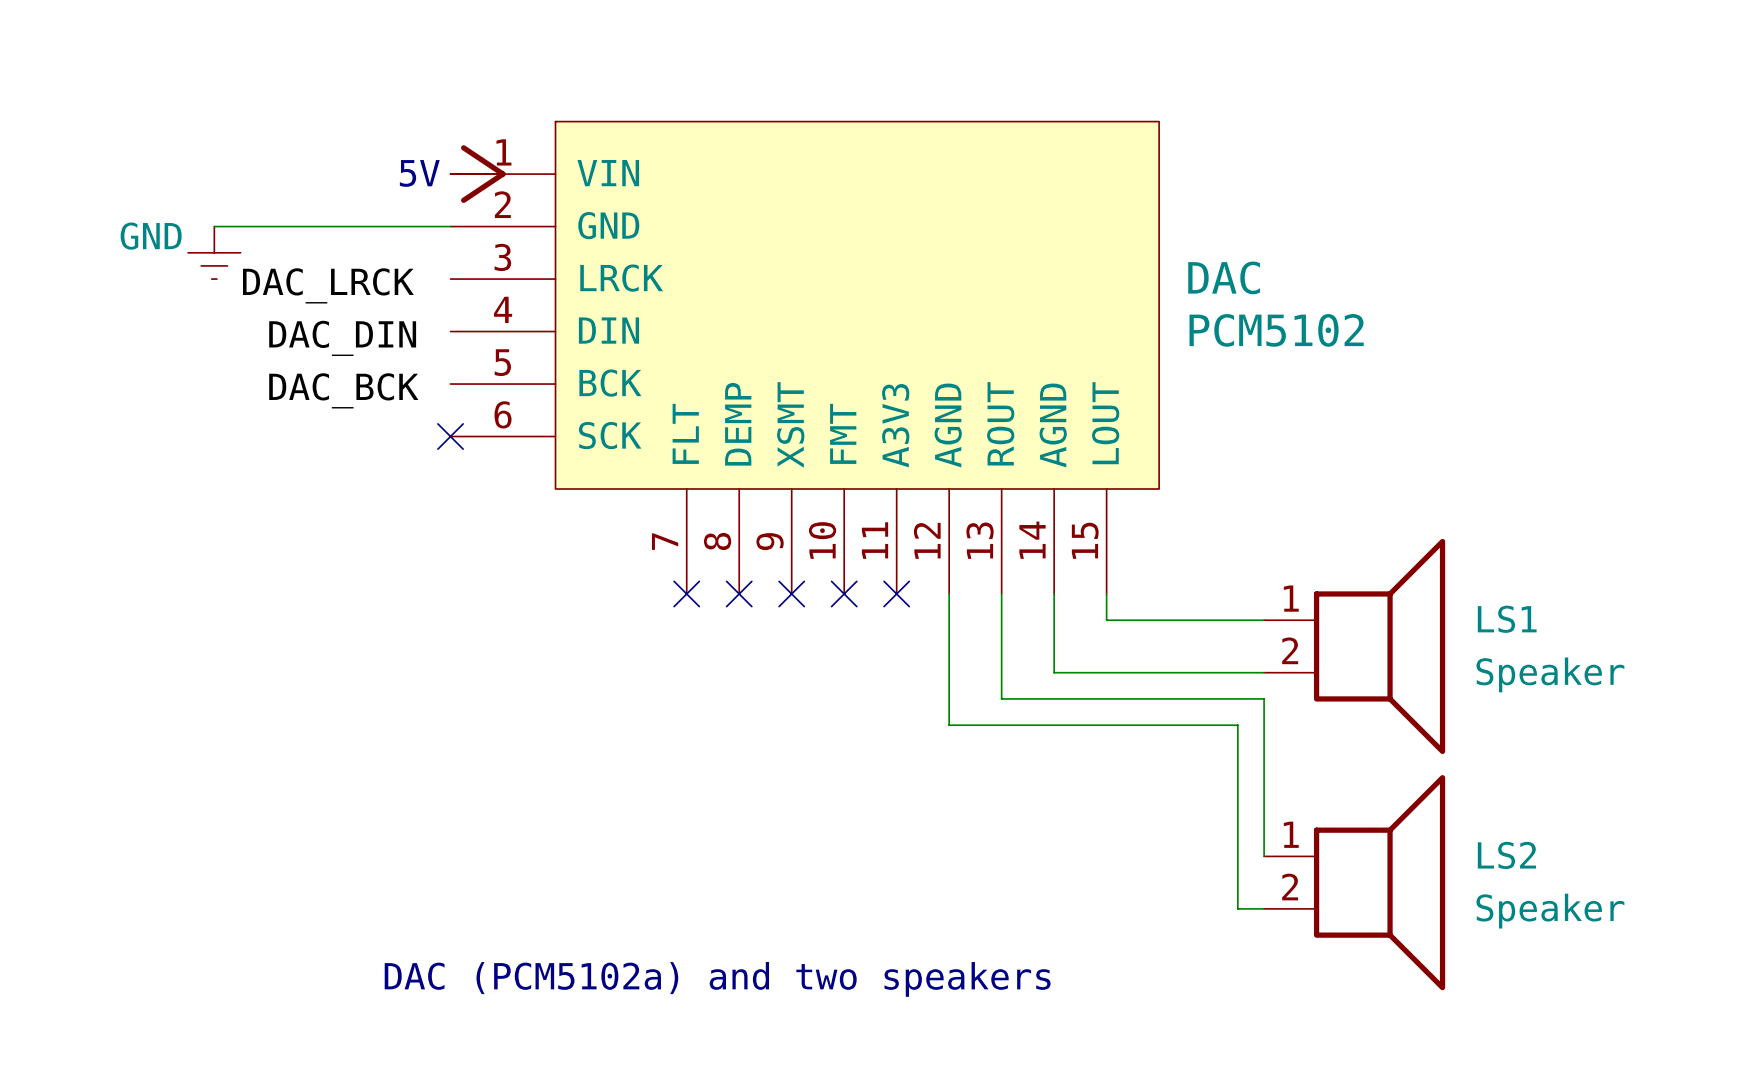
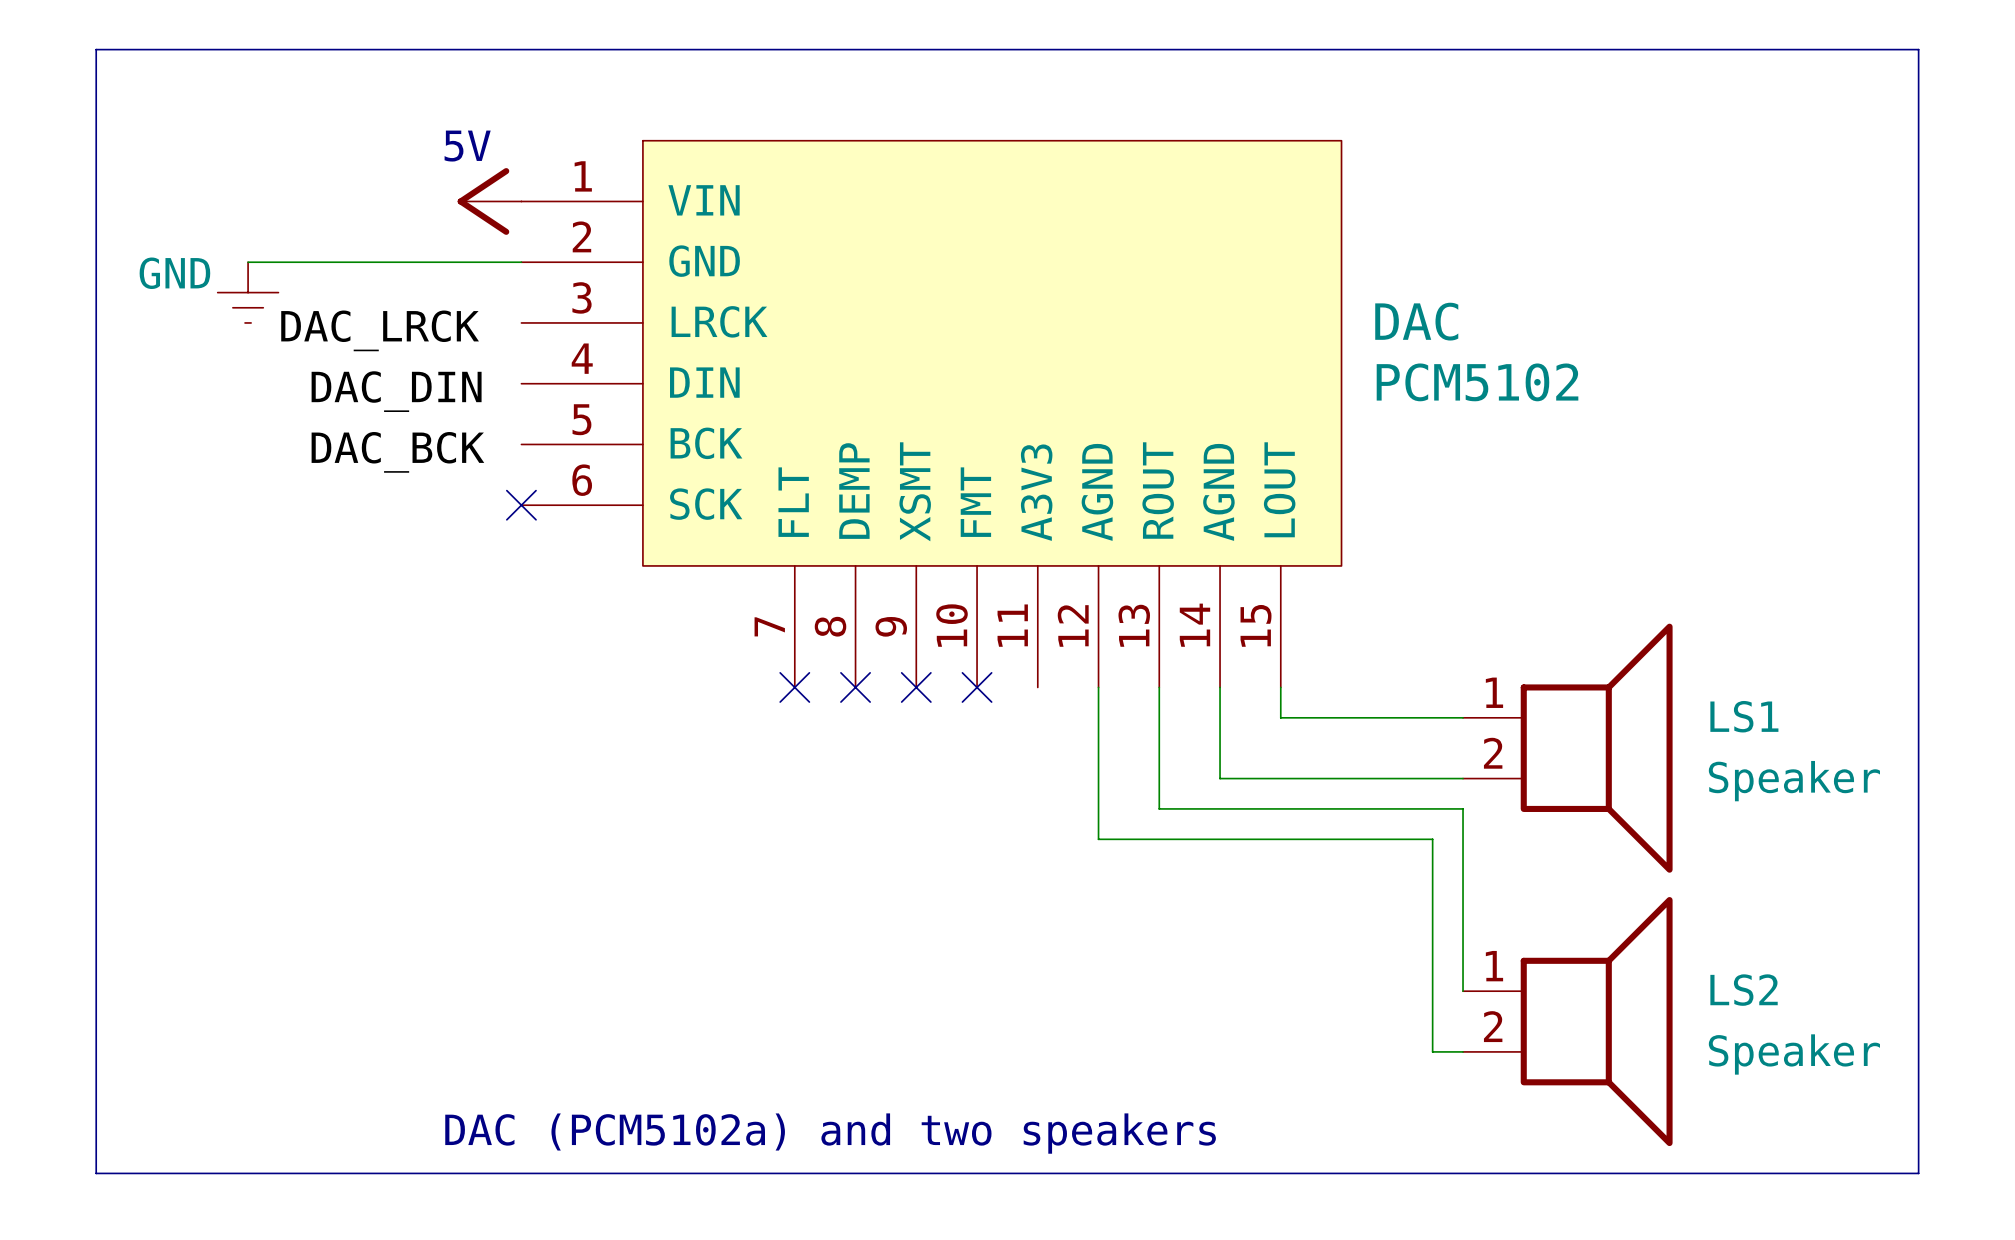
line: none -> (96, 49) (96, 1173) (1918, 1173) (1918, 49) (96, 49)
text position: 5V (419, 173) -> 5V (467, 146)
power symbol position: (478, 174) -> (489, 201)
power symbol rotation: 0° (483, 174) -> 180° (483, 201)
no-connect mark: (896, 593) -> none

